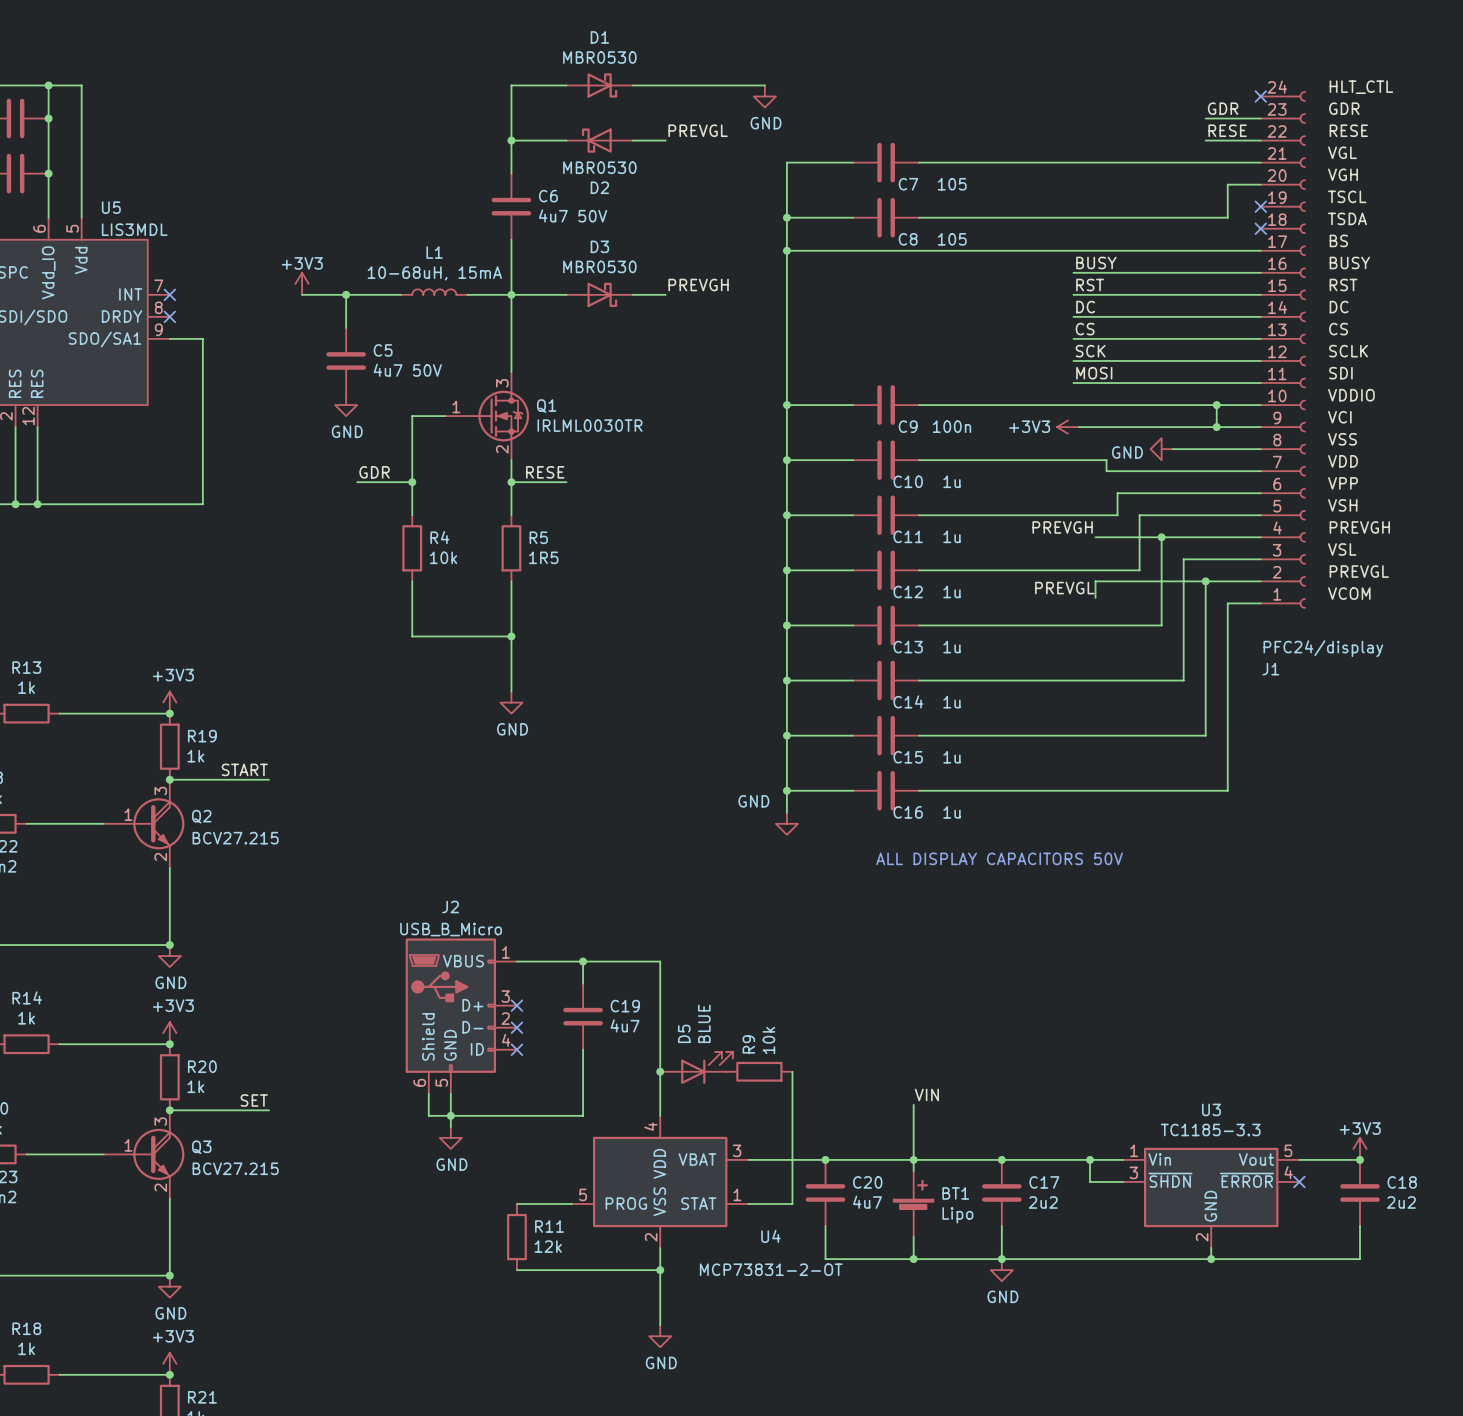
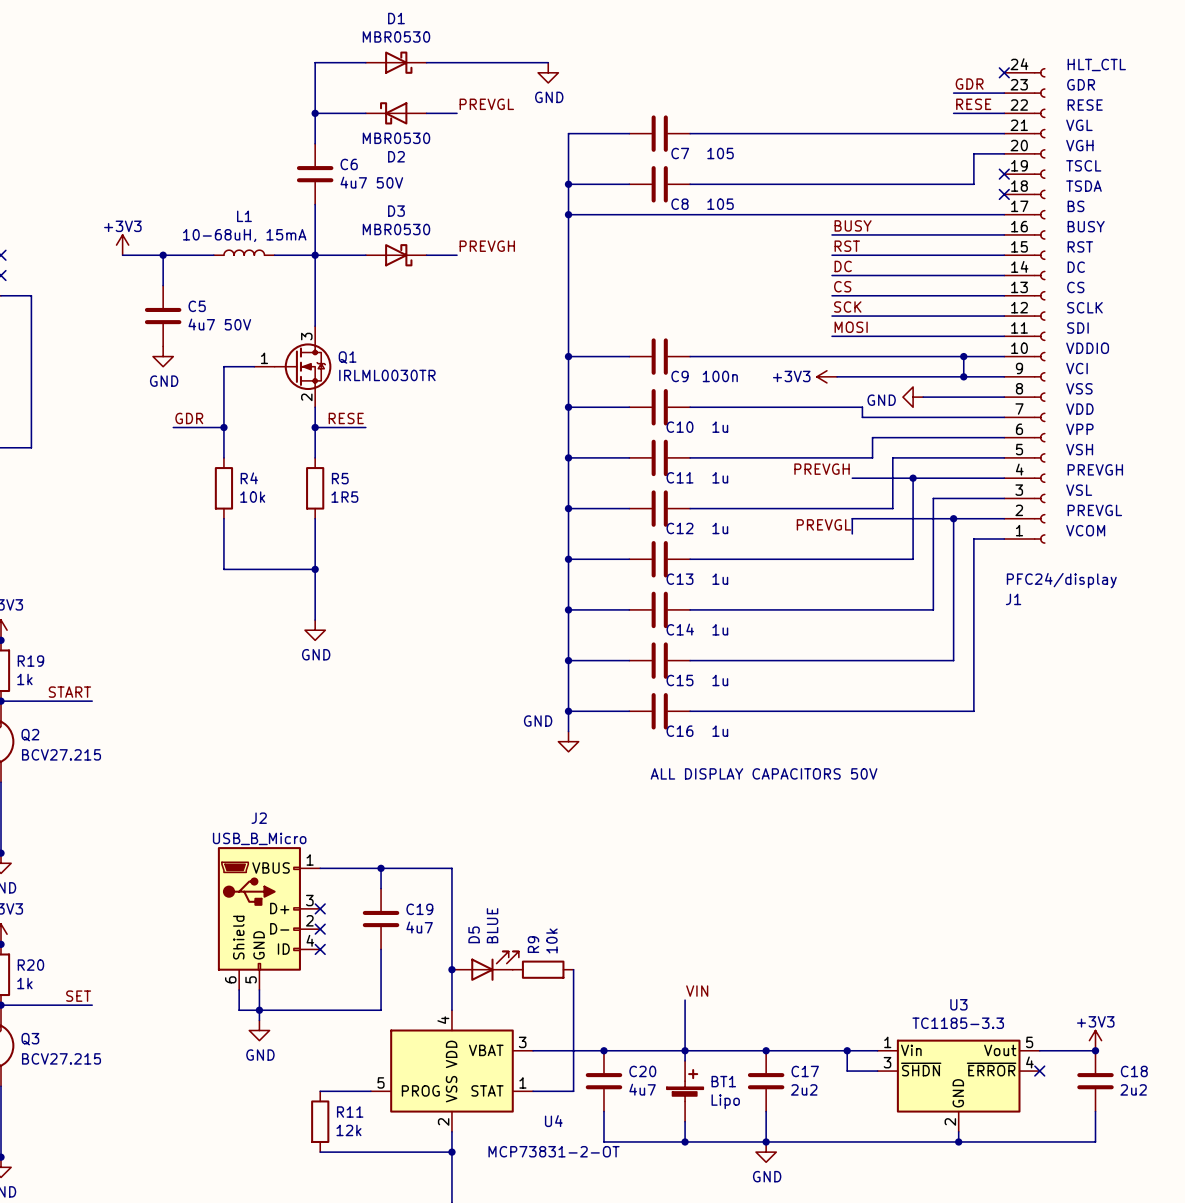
label: HLT_CTL (1361, 87) -> none
text: none -> HLT_CTL (1096, 65)
label: GDR (1344, 108) -> none
text: none -> GDR (1081, 84)
label: RESE (1348, 130) -> none
text: none -> RESE (1085, 105)
label: VGL (1342, 152) -> none
text: none -> VGL (1079, 125)
label: VGH (1343, 174) -> none
text: none -> VGH (1079, 145)
label: TSCL (1347, 196) -> none
text: none -> TSCL (1083, 165)
label: TSDA (1347, 218) -> none
text: none -> TSDA (1083, 186)
label: BS (1338, 240) -> none
text: none -> BS (1076, 206)
label: BUSY (1349, 262) -> none
text: none -> BUSY (1086, 226)
label: RST (1343, 285) -> none
text: none -> RST (1080, 246)
label: DC (1339, 307) -> none
text: none -> DC (1076, 267)
label: CS (1338, 329) -> none
text: none -> CS (1075, 287)
label: SCLK (1348, 351) -> none
text: none -> SCLK (1084, 307)
label: SDI (1340, 373) -> none
text: none -> SDI (1077, 328)
label: VDDIO (1351, 395) -> none
text: none -> VDDIO (1087, 348)
label: VCI (1339, 417) -> none
text: none -> VCI (1076, 368)
label: VSS (1342, 439) -> none
text: none -> VSS (1079, 388)
label: VDD (1343, 461) -> none
text: none -> VDD (1079, 409)
label: VPP (1343, 483) -> none
text: none -> VPP (1079, 429)
label: VSH (1342, 505) -> none
text: none -> VSH (1079, 449)
label: PREVGH (1359, 527) -> none
text: none -> PREVGH (1095, 469)
label: VSL (1342, 549) -> none
text: none -> VSL (1079, 490)
label: PREVGL (1359, 571) -> none
text: none -> PREVGL (1094, 510)
label: VCOM (1349, 593) -> none
text: none -> VCOM (1085, 530)

